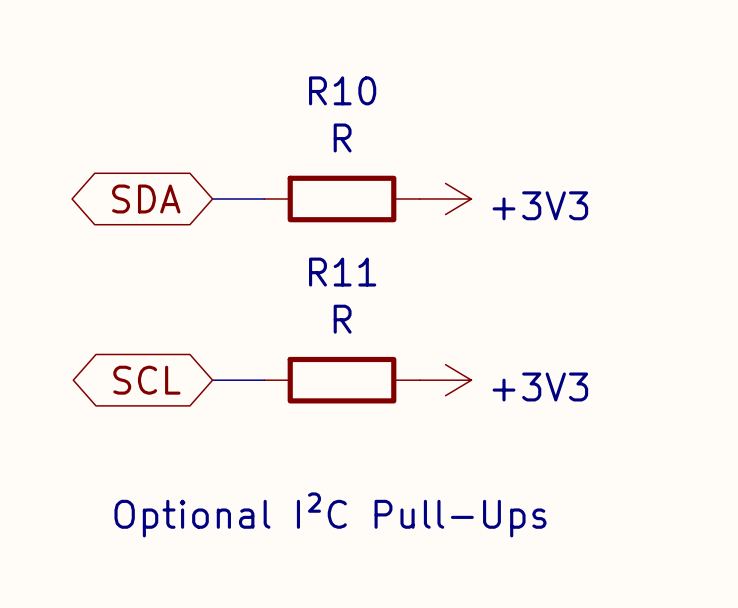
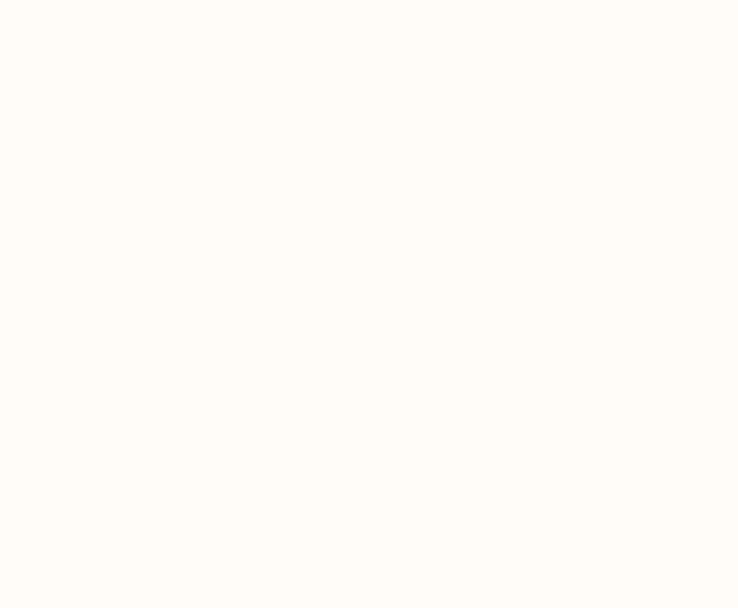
global label: SDA (146, 199) -> none
wire: (212, 199) (264, 199) -> none
R10: R (342, 199) -> none
power symbol: +3V3 (445, 199) -> none
global label: SCL (146, 380) -> none
wire: (212, 380) (264, 380) -> none
R11: R (342, 380) -> none
power symbol: +3V3 (445, 380) -> none
text: Optional I²C Pull-Ups (330, 514) -> none

